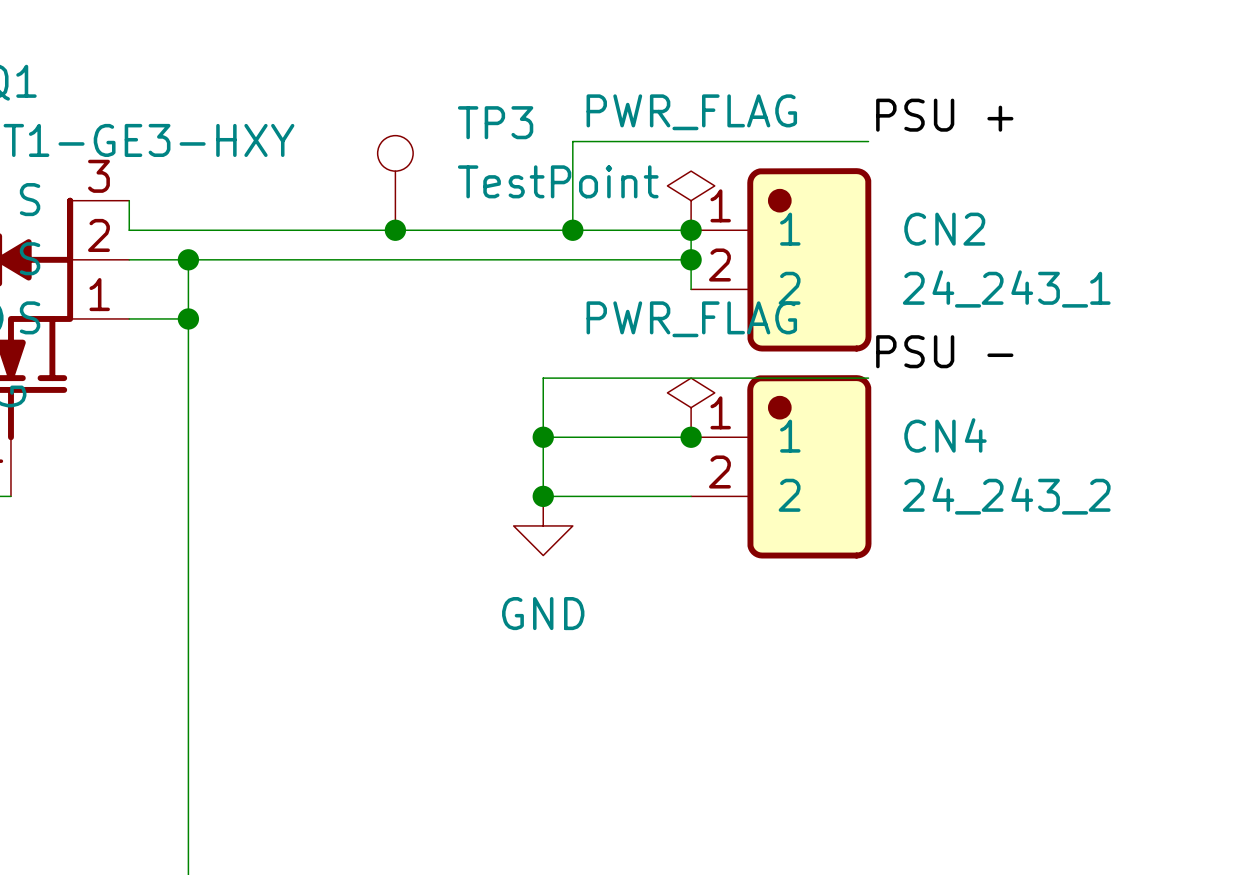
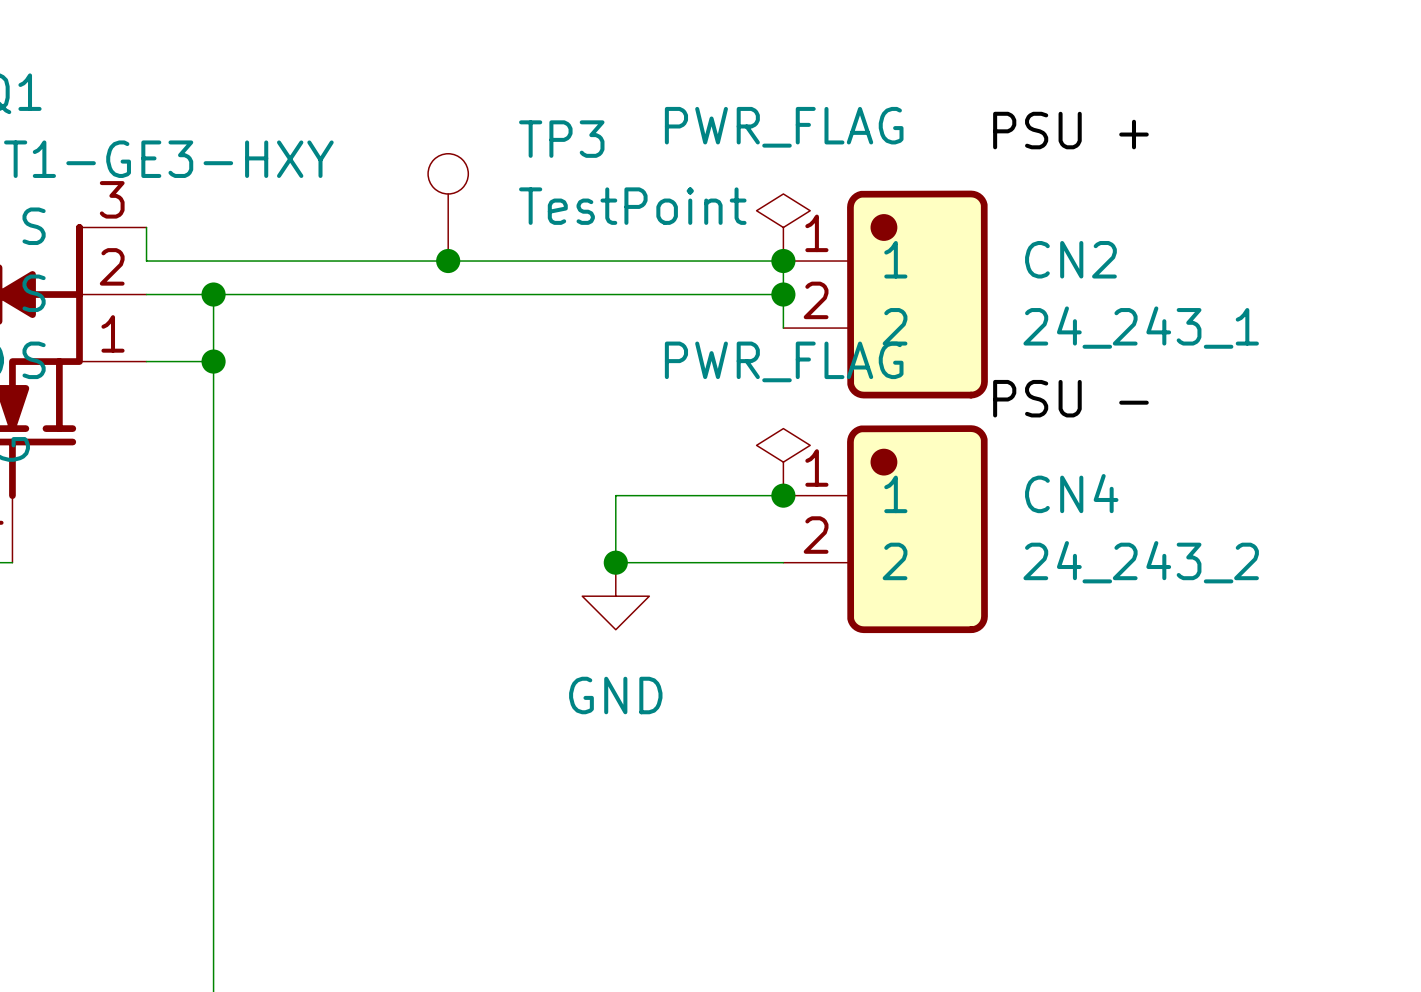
wire: (868, 141) (572, 141) (572, 230) -> none
junction: (572, 230) -> none
wire: (868, 378) (543, 378) (543, 437) -> none
junction: (543, 437) -> none

